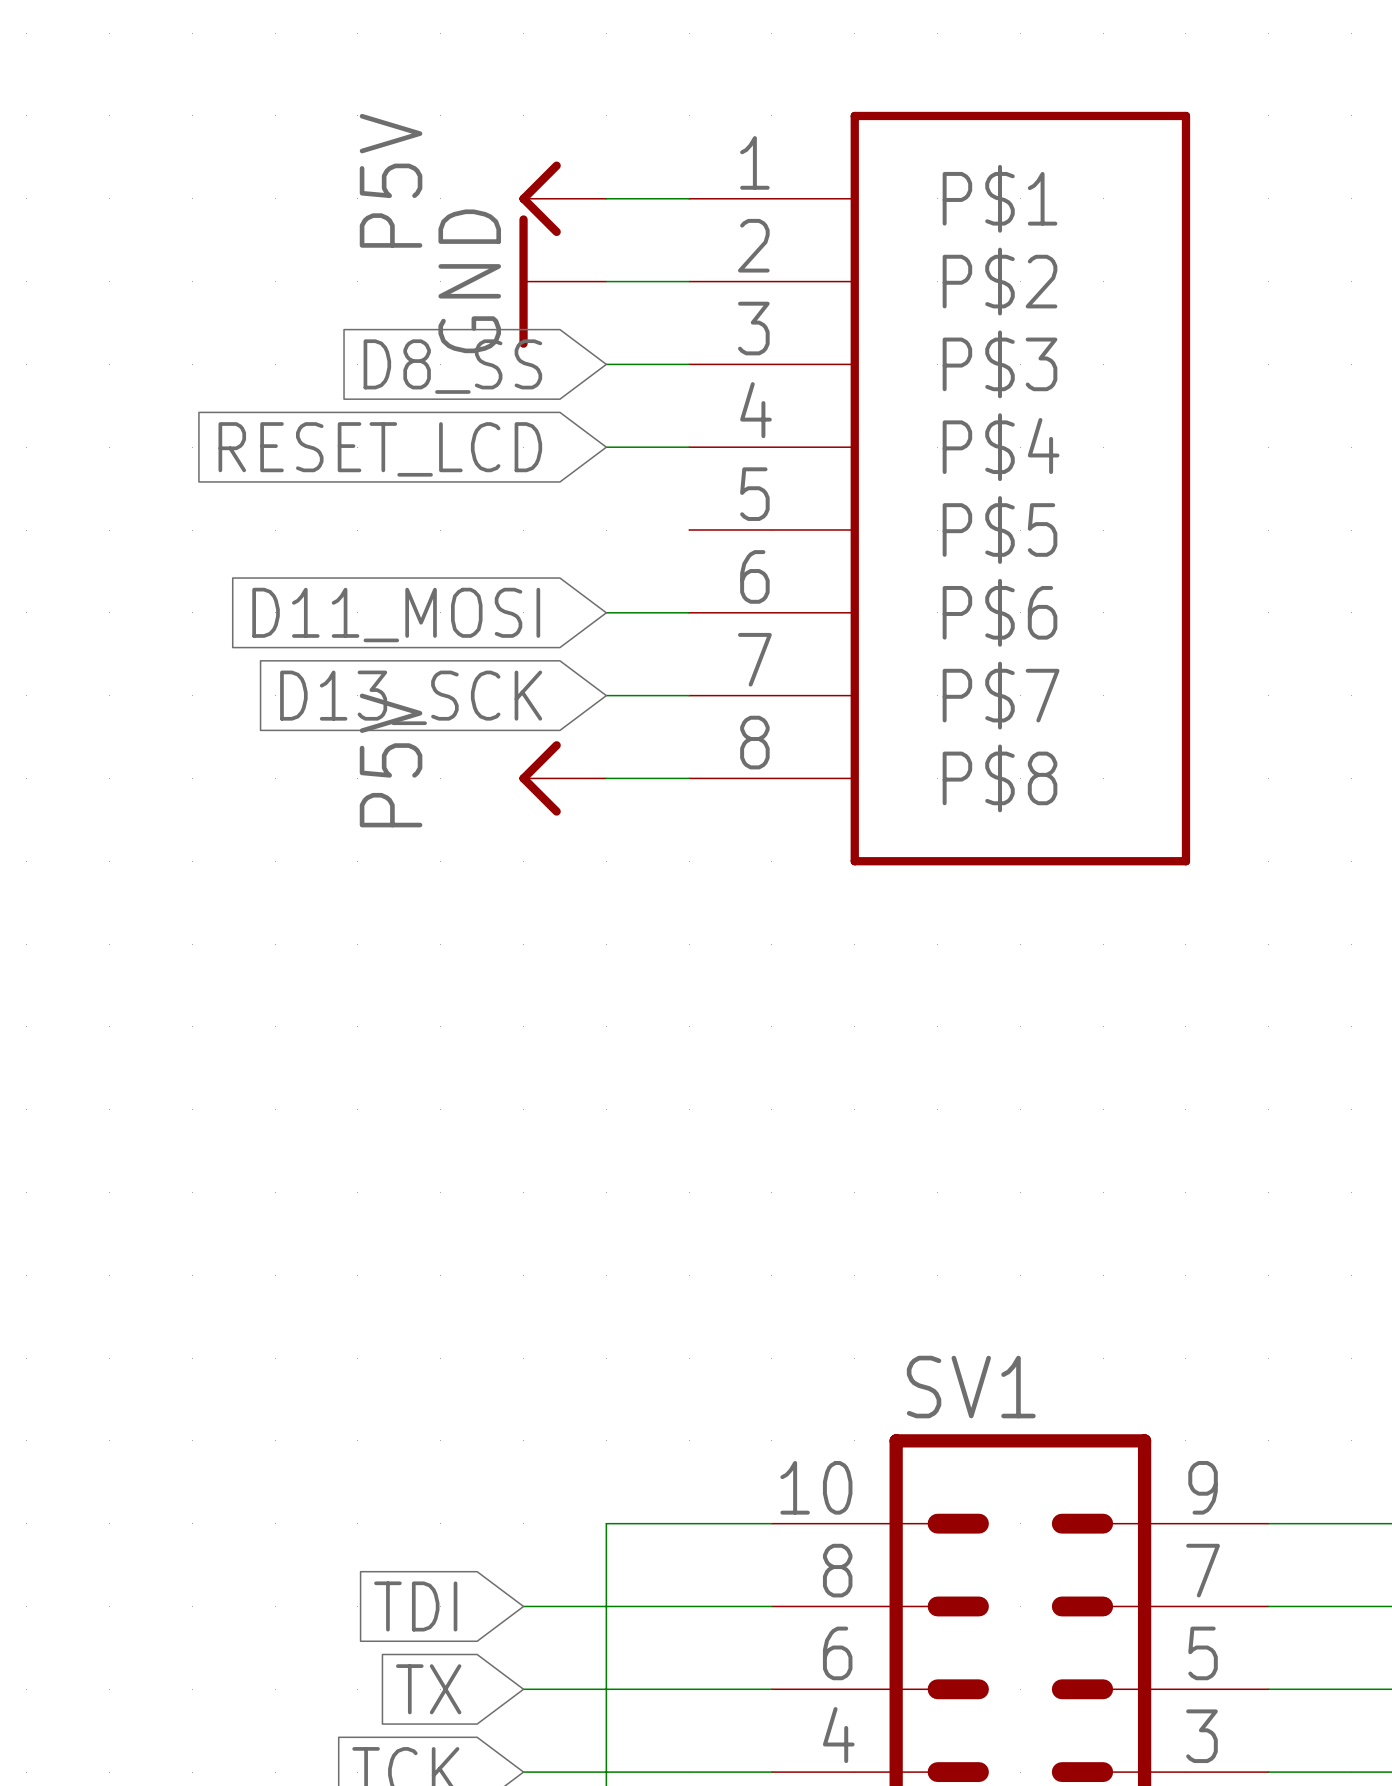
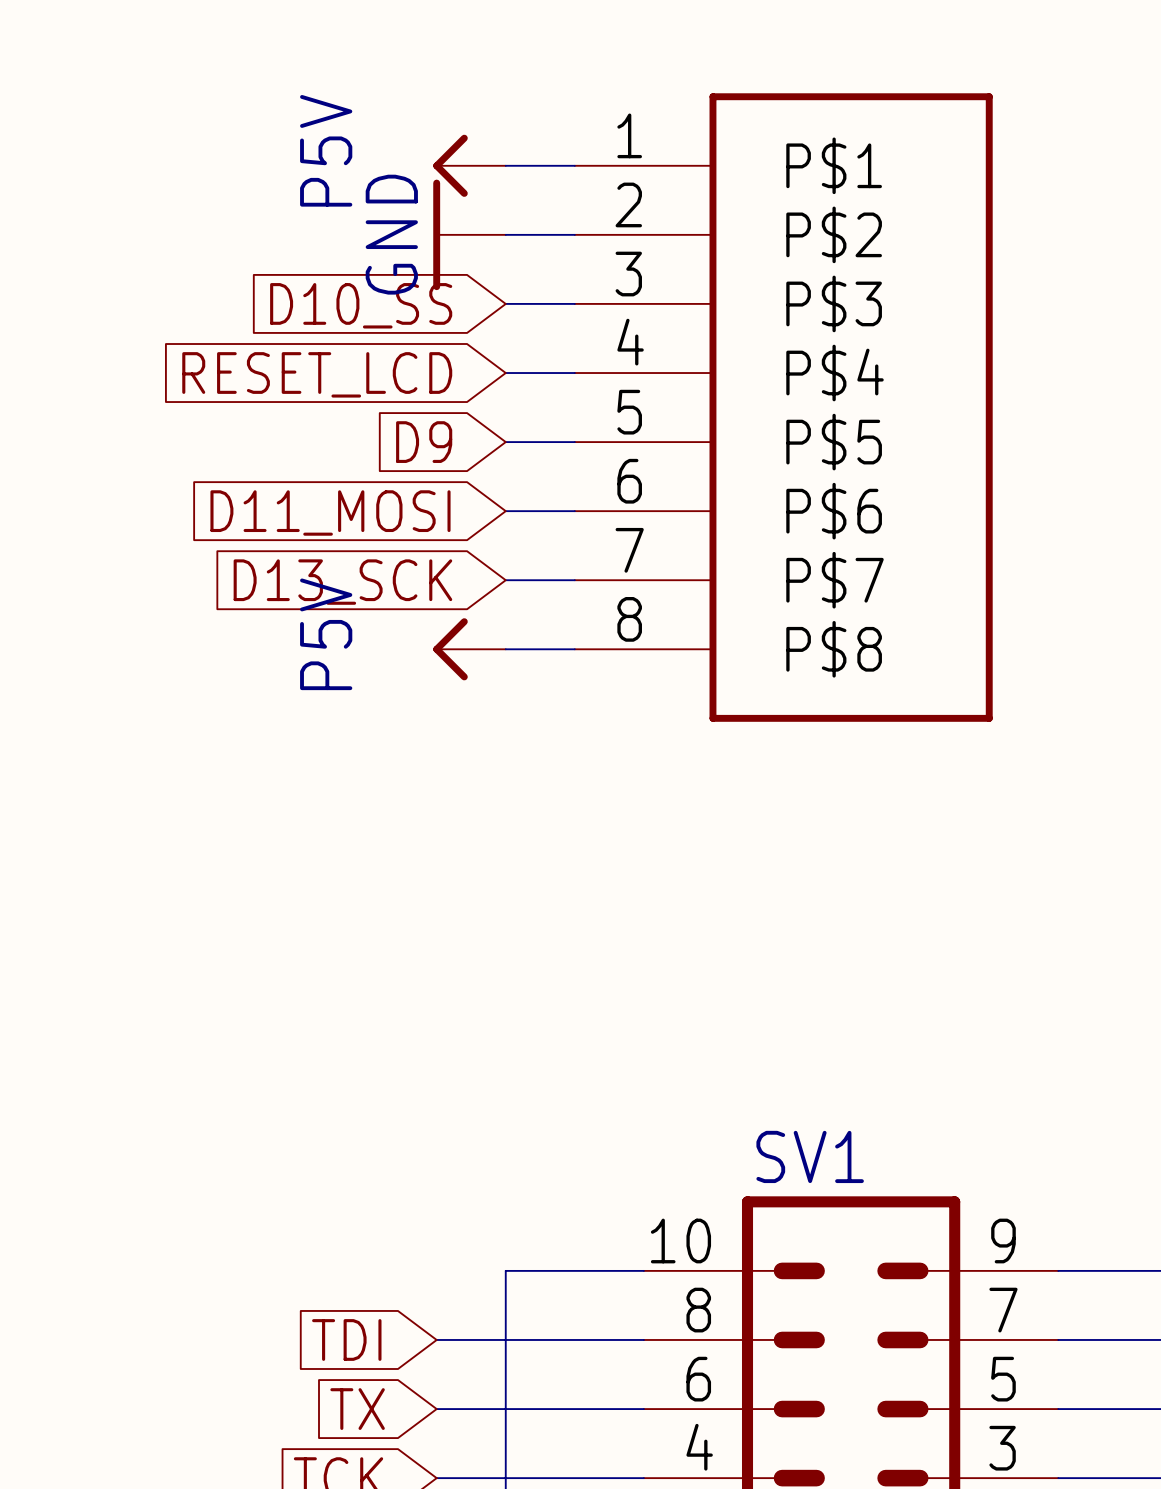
global label: D8_SS (452, 366) -> D10_SS (361, 305)
global label: none -> D9 (424, 442)
wire: none -> (505, 442) (574, 442)

